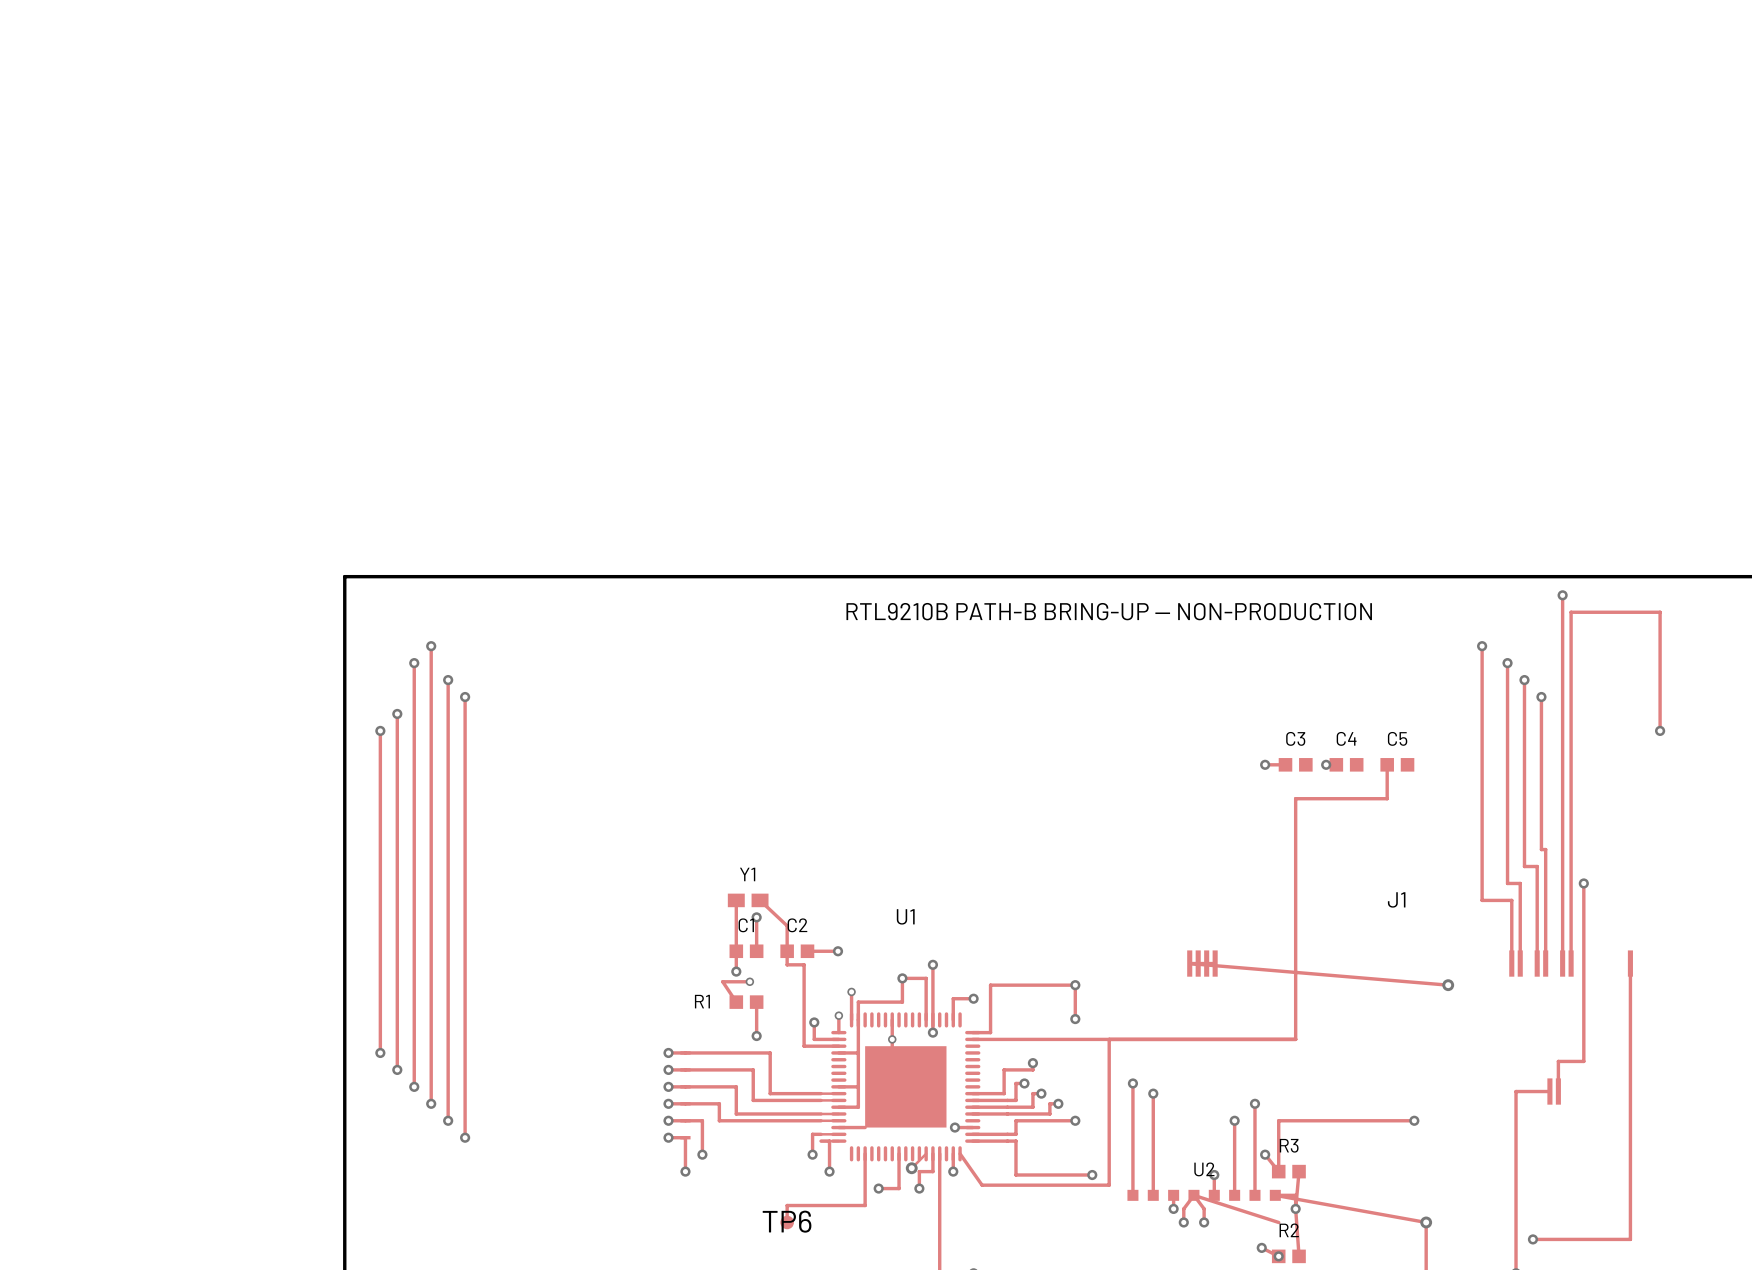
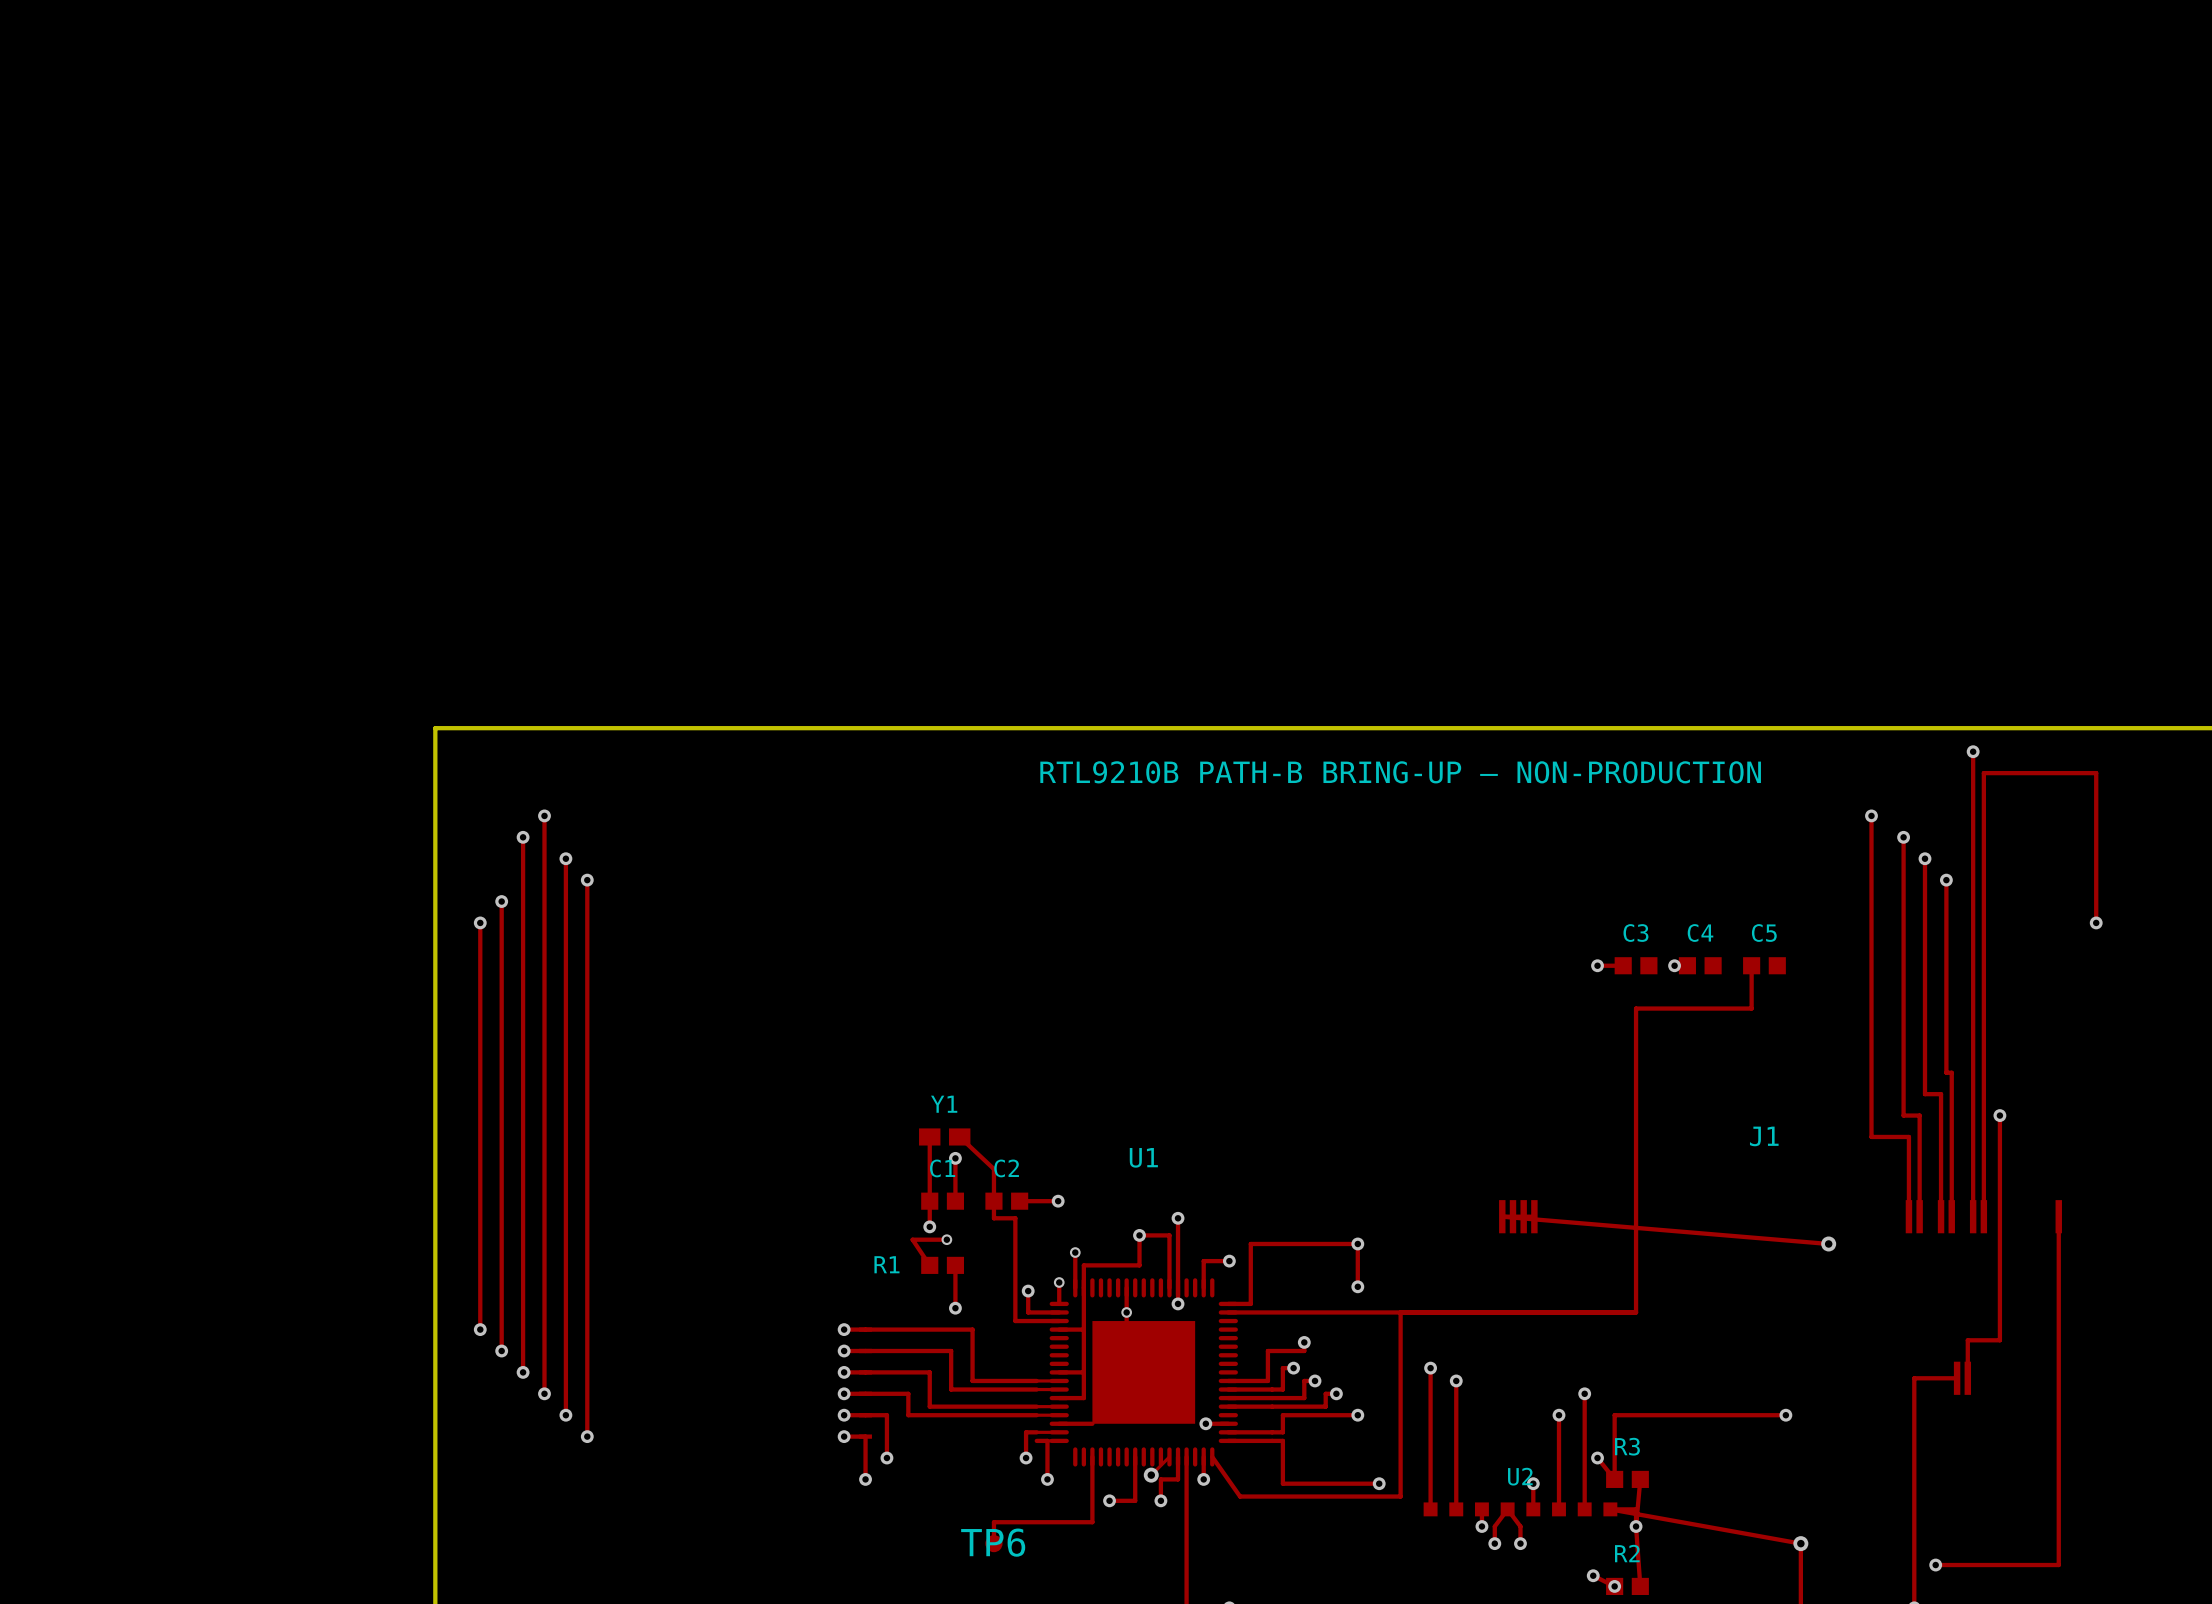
track: (1193, 1195) (1278, 1222) -> none

